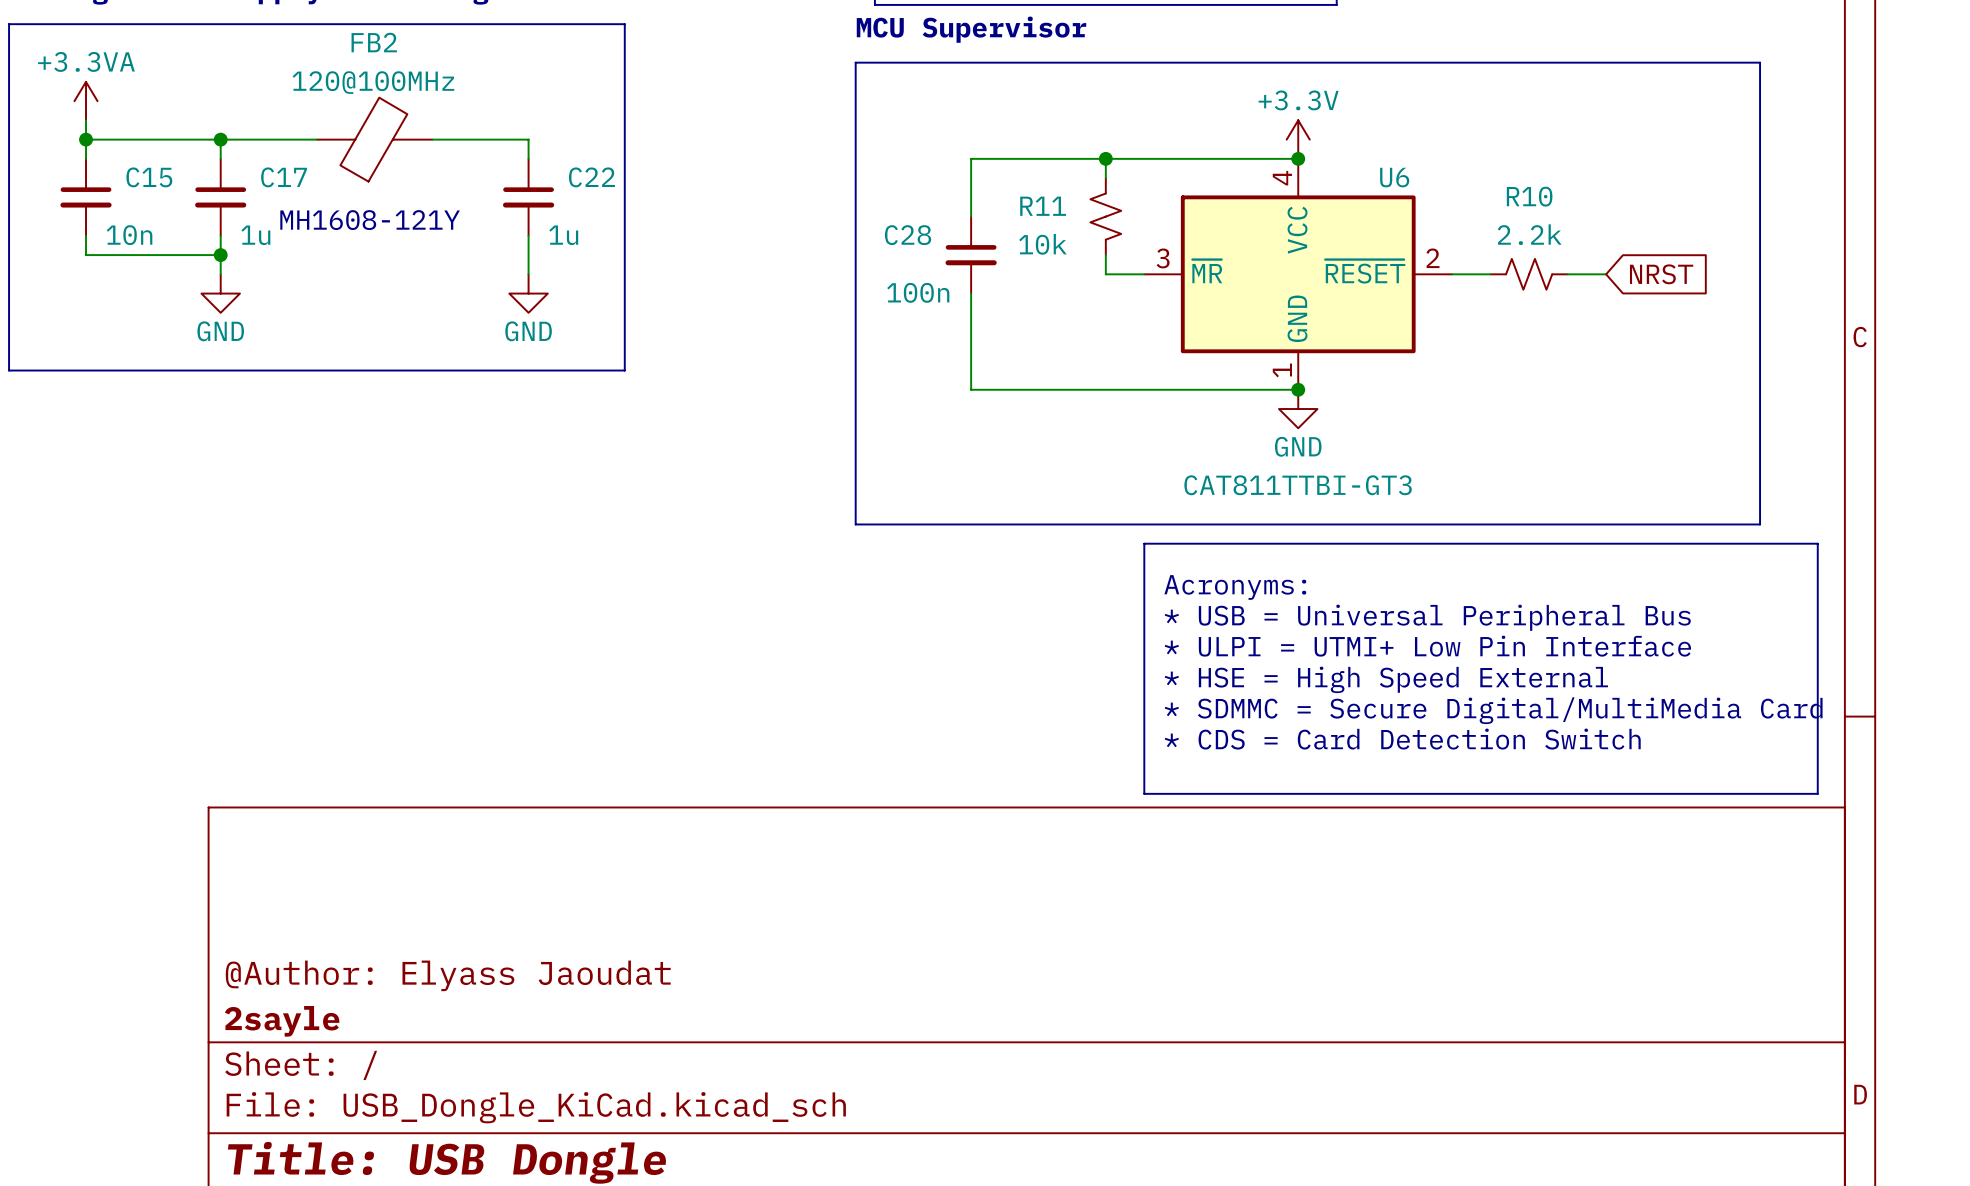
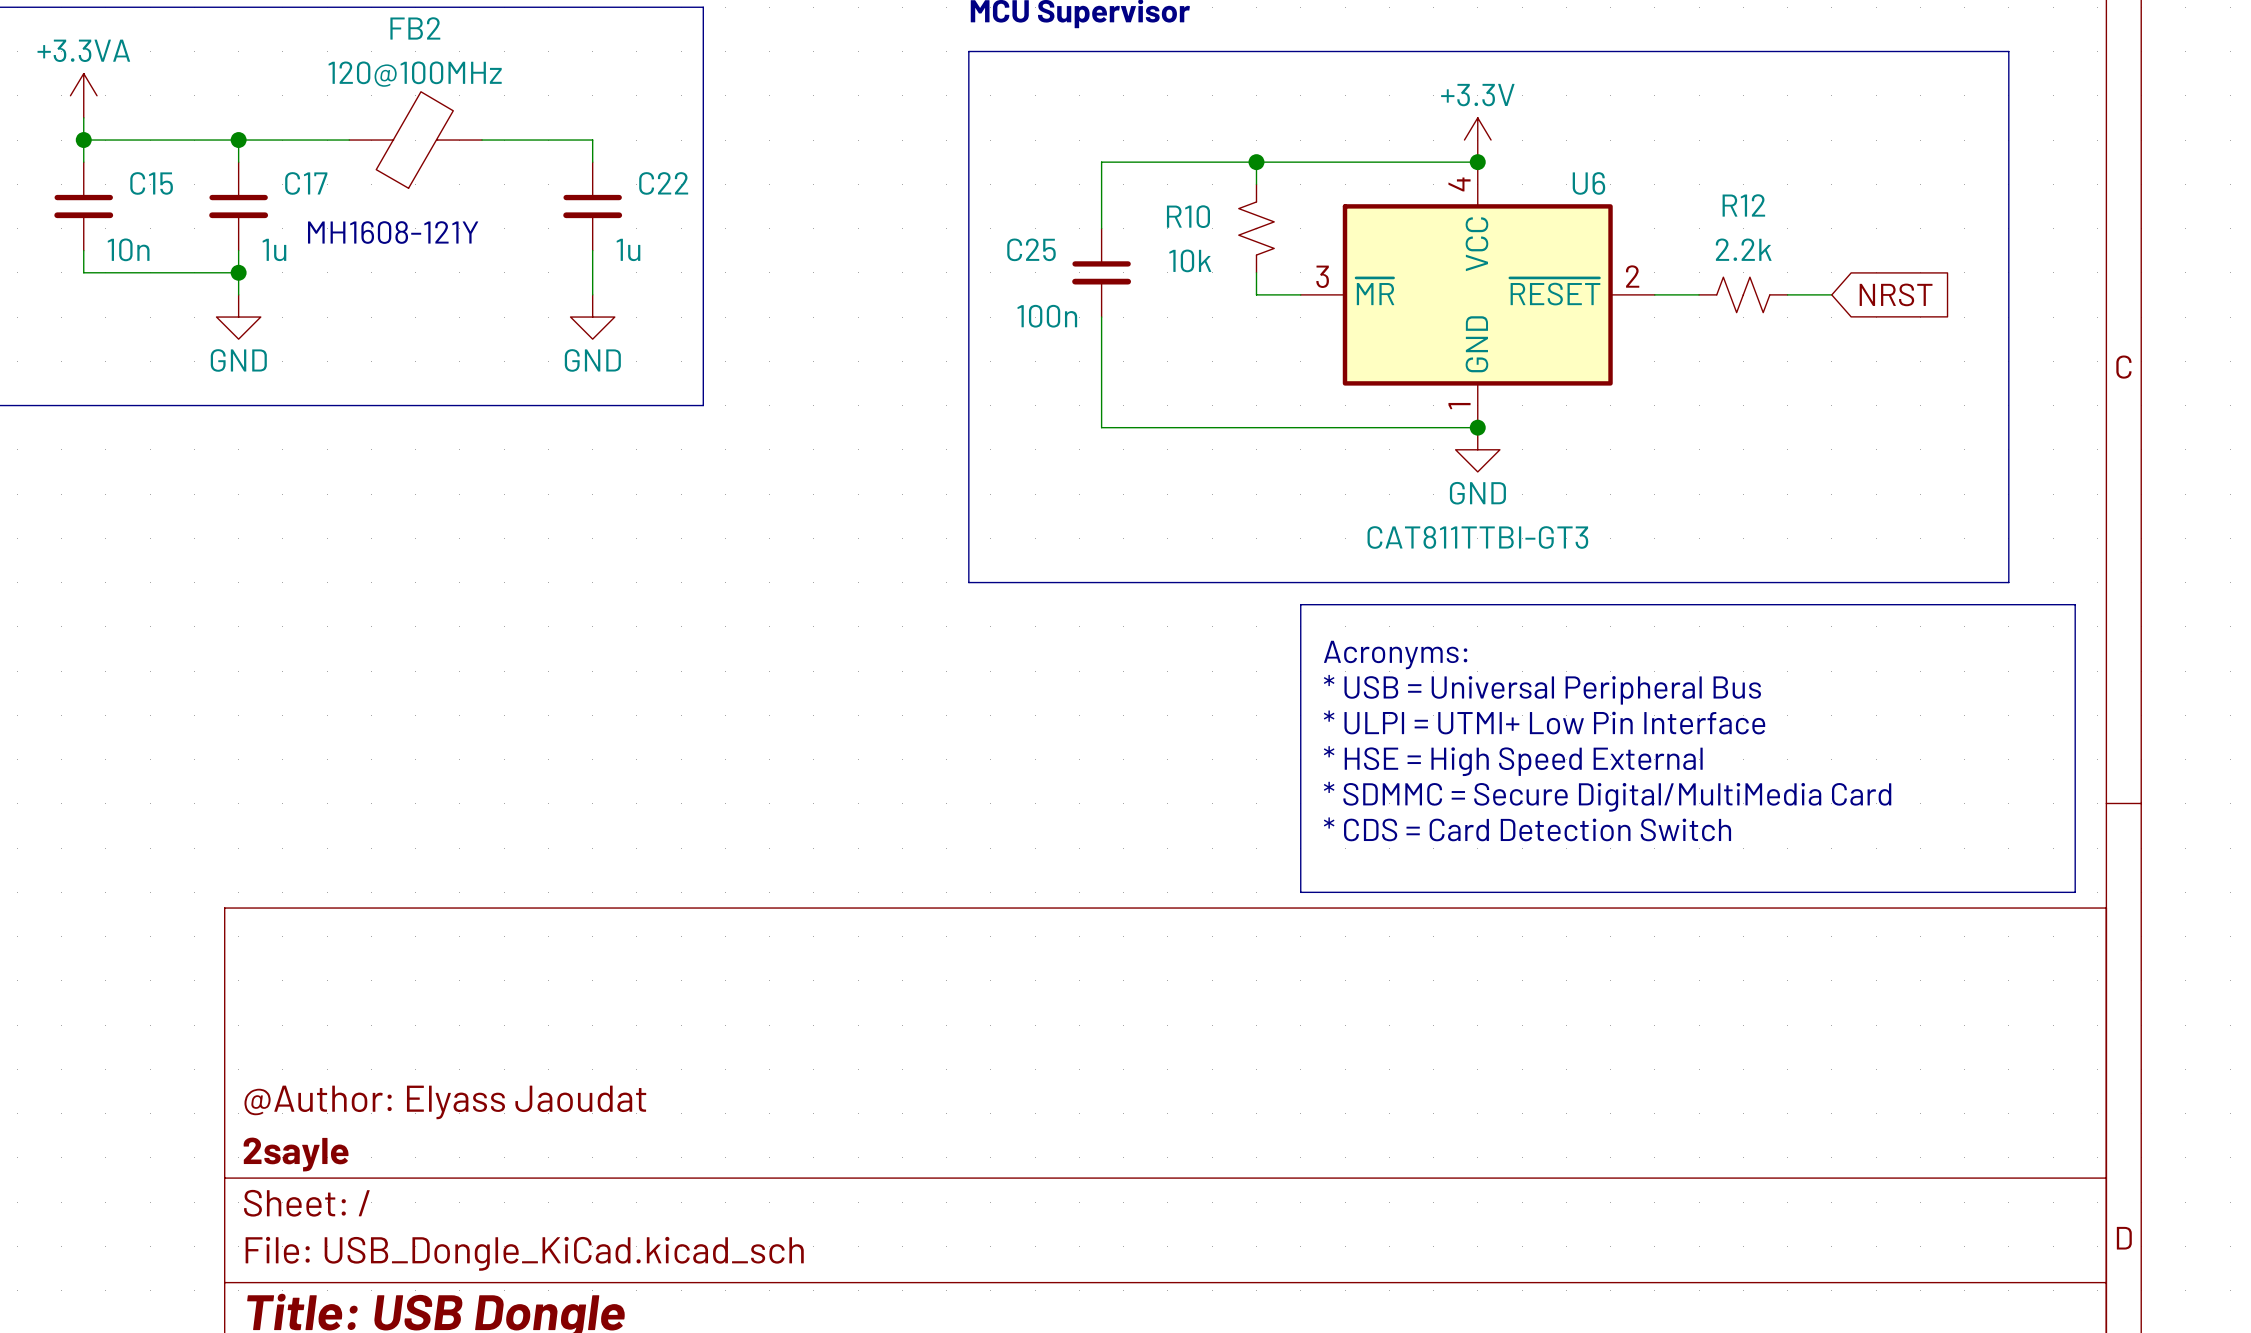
R10 name: R10 (1529, 196) -> R12 (1743, 205)
R11 name: R11 (1043, 206) -> R10 (1188, 216)
C28 name: C28 (908, 235) -> C25 (1031, 249)

